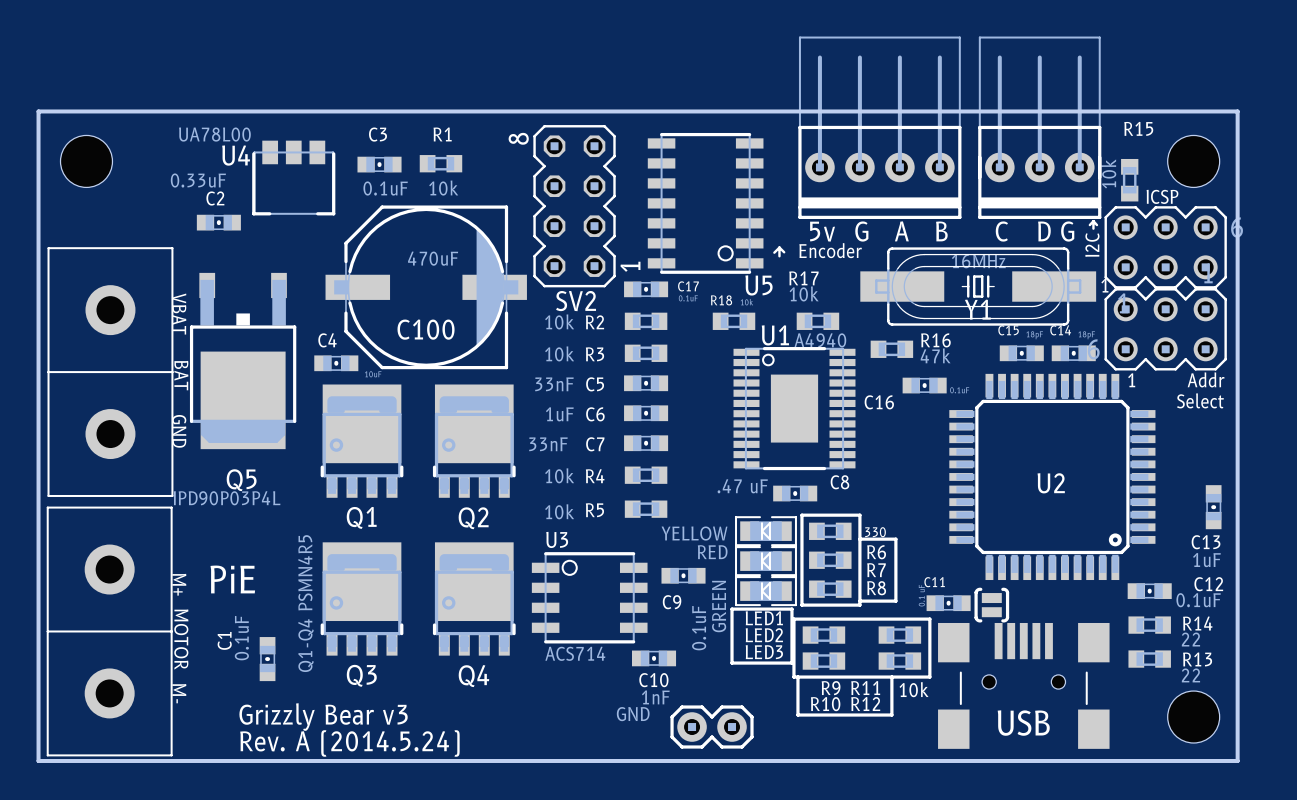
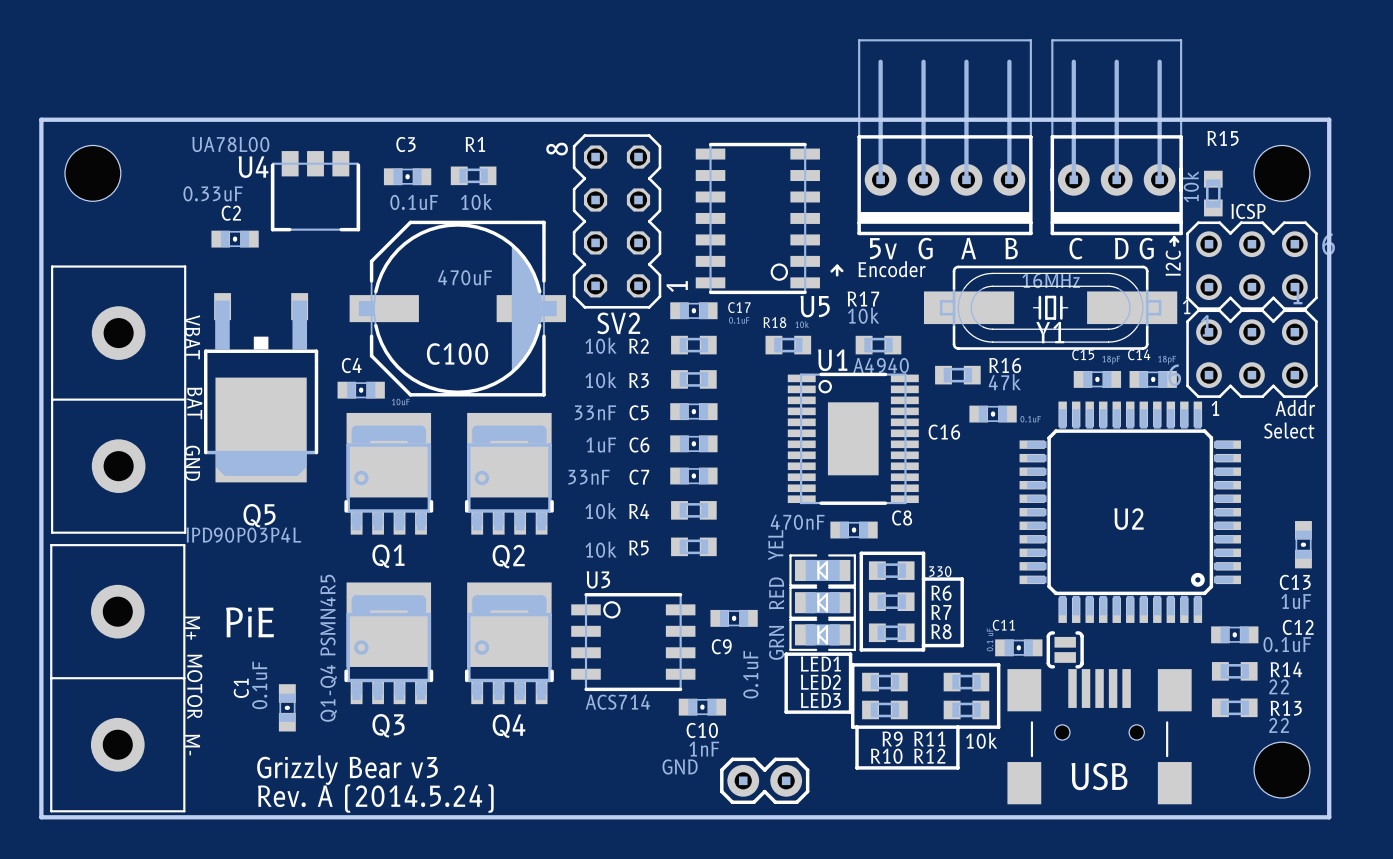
C8 value: .47 uF (742, 486) -> 470nF (797, 522)
LED1 value: YELLOW (694, 533) -> YEL (775, 545)
LED2 value rotation: 0° (712, 552) -> 90° counterclockwise (776, 593)
LED3 value: GREEN (719, 606) -> GRN (776, 642)

